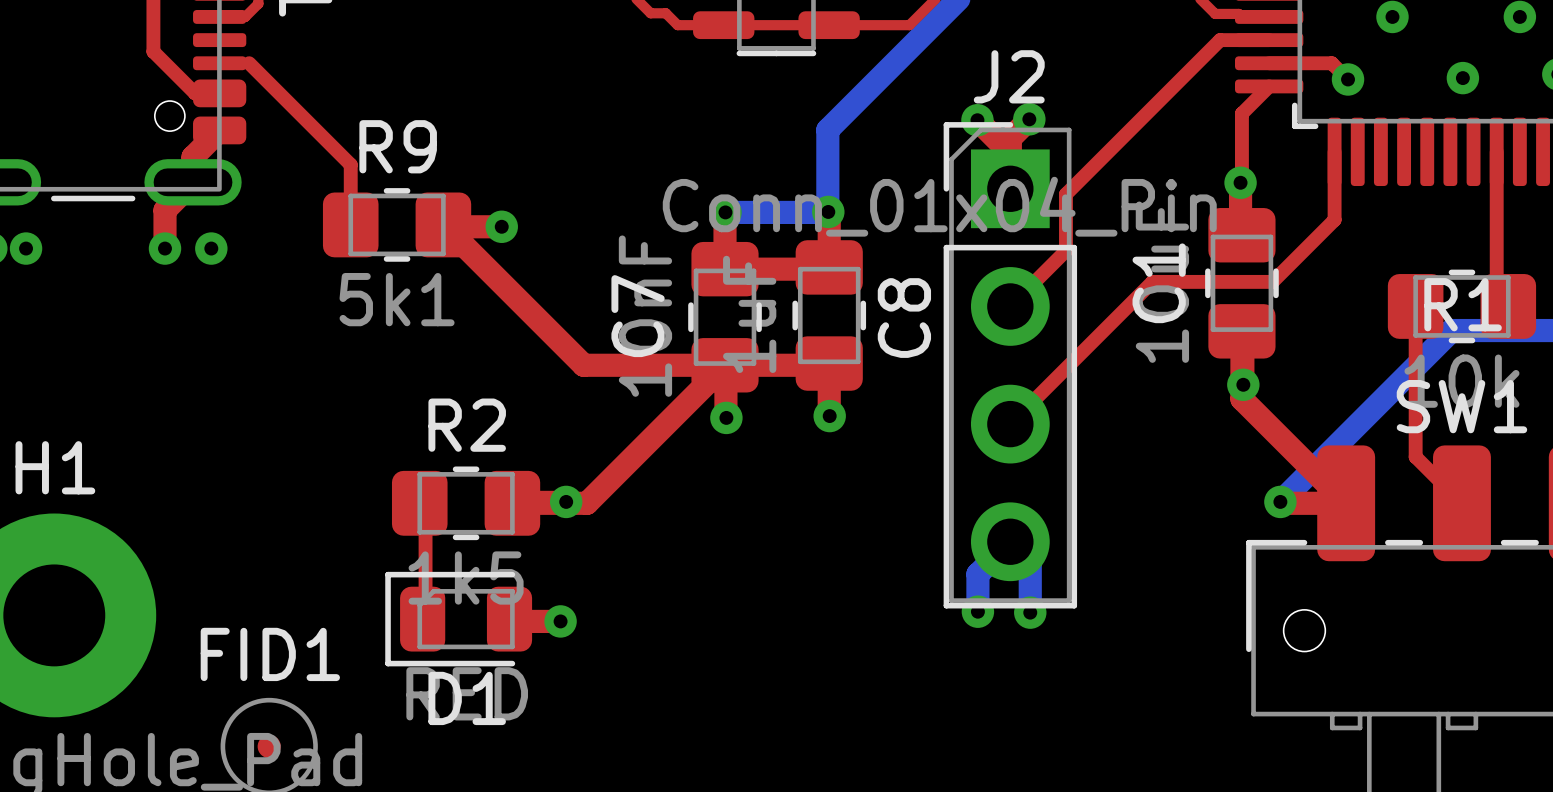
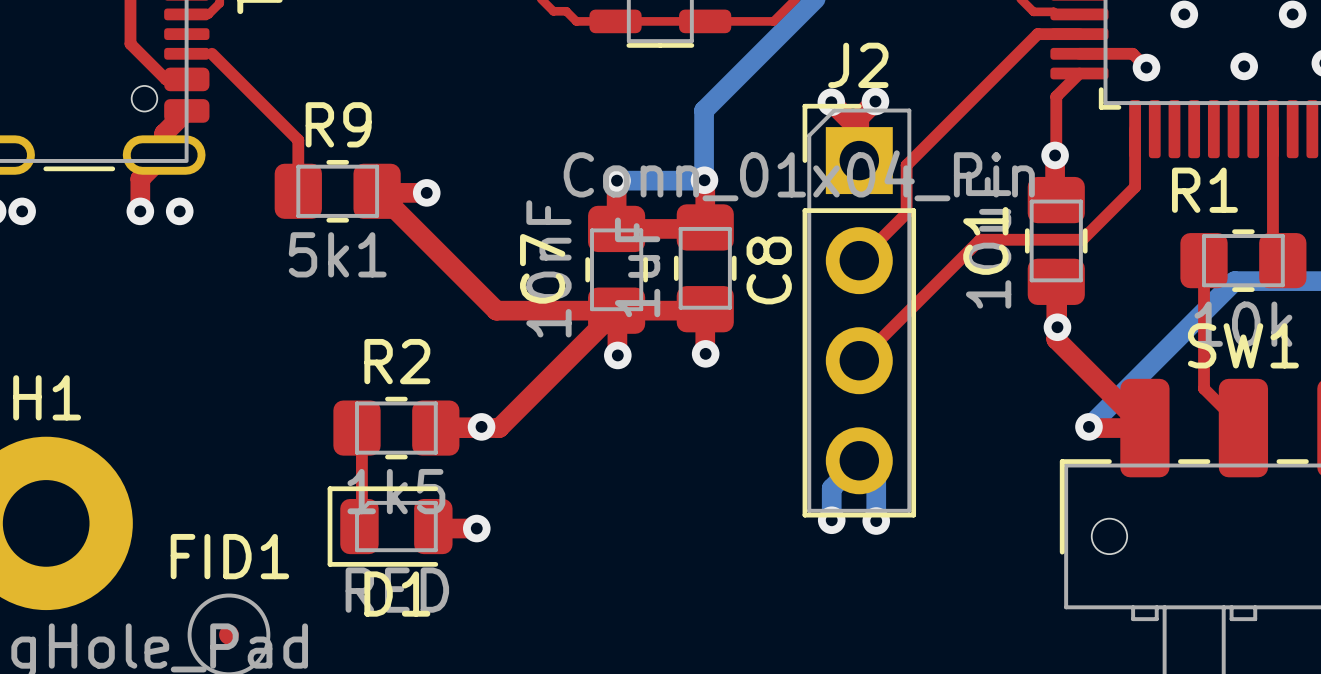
R1 name position: R1 (1463, 304) -> R1 (1204, 190)

